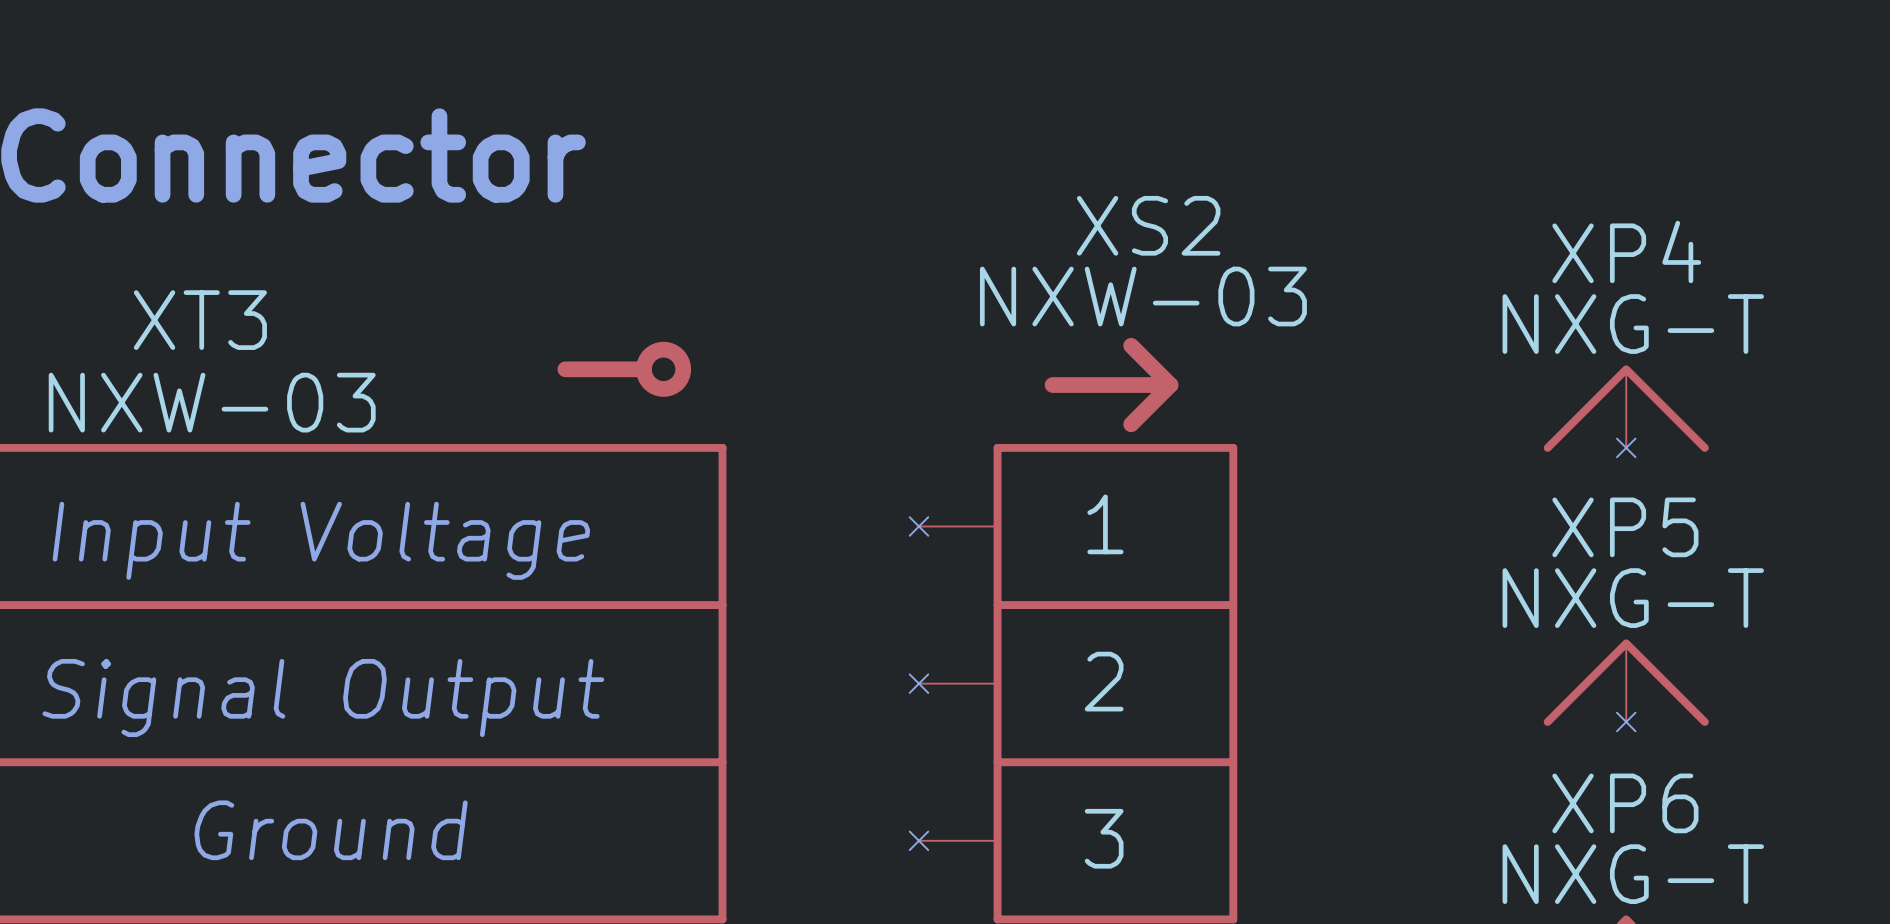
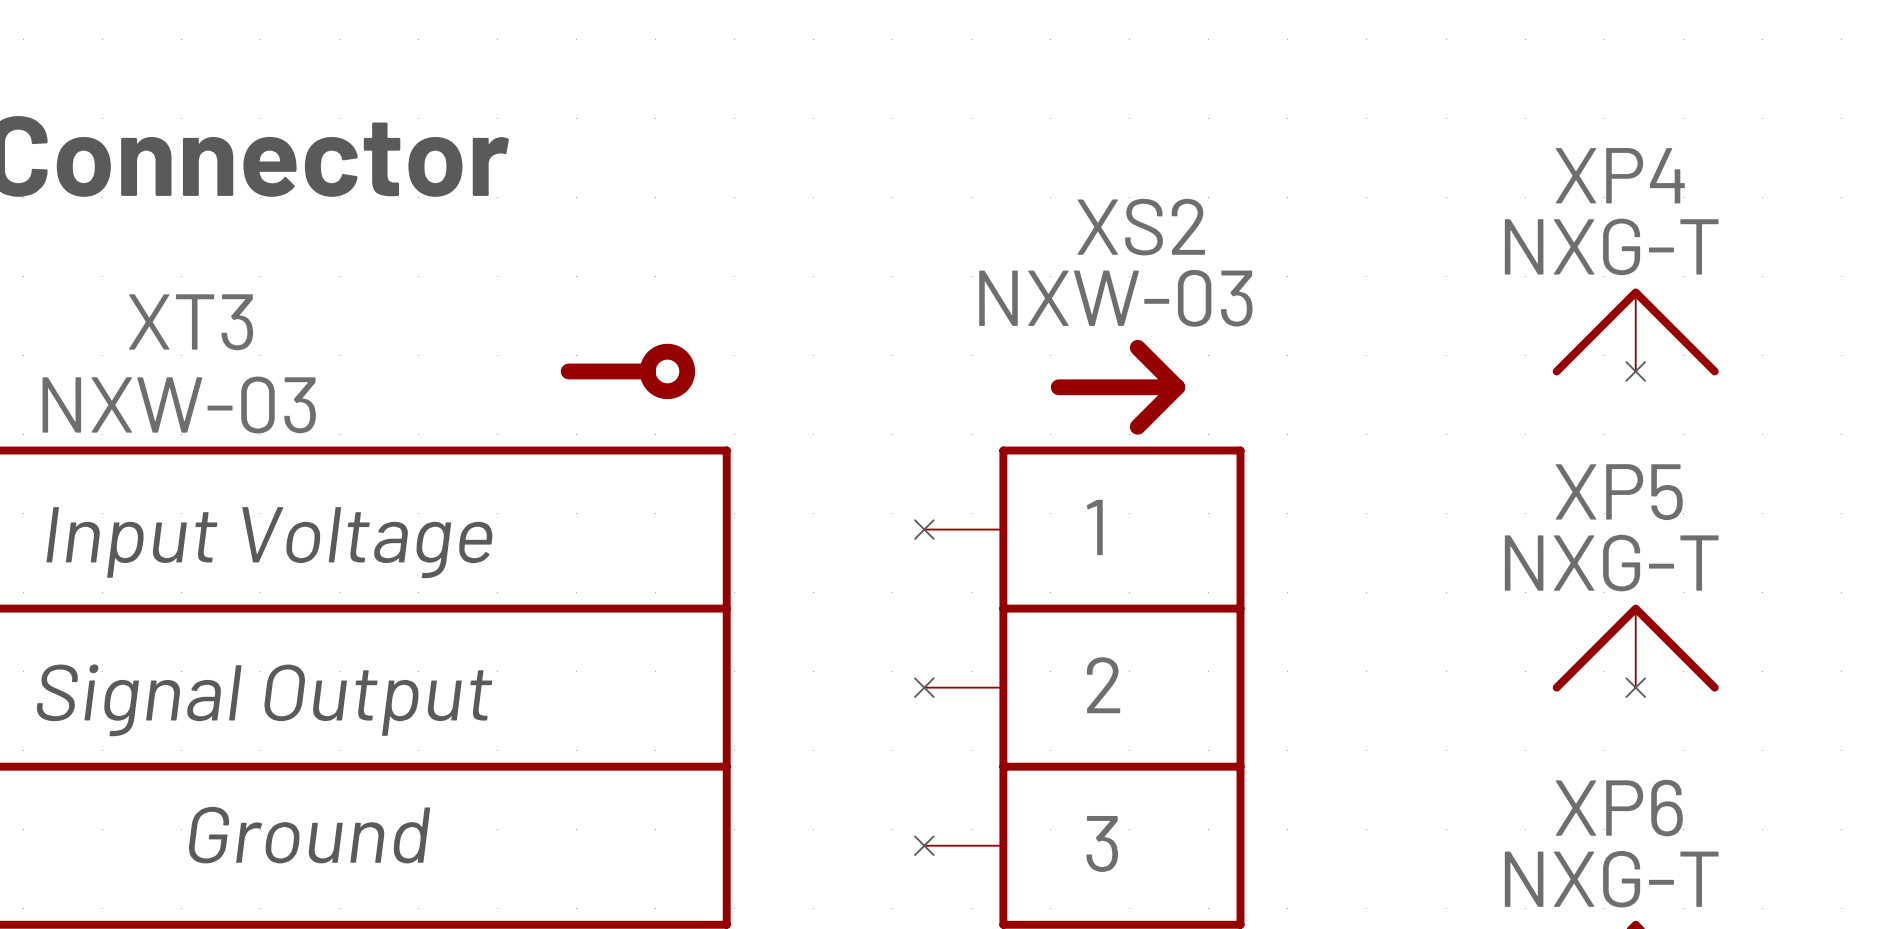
XP4 position: (1626, 411) -> (1635, 334)
XP5 position: (1626, 685) -> (1635, 650)

